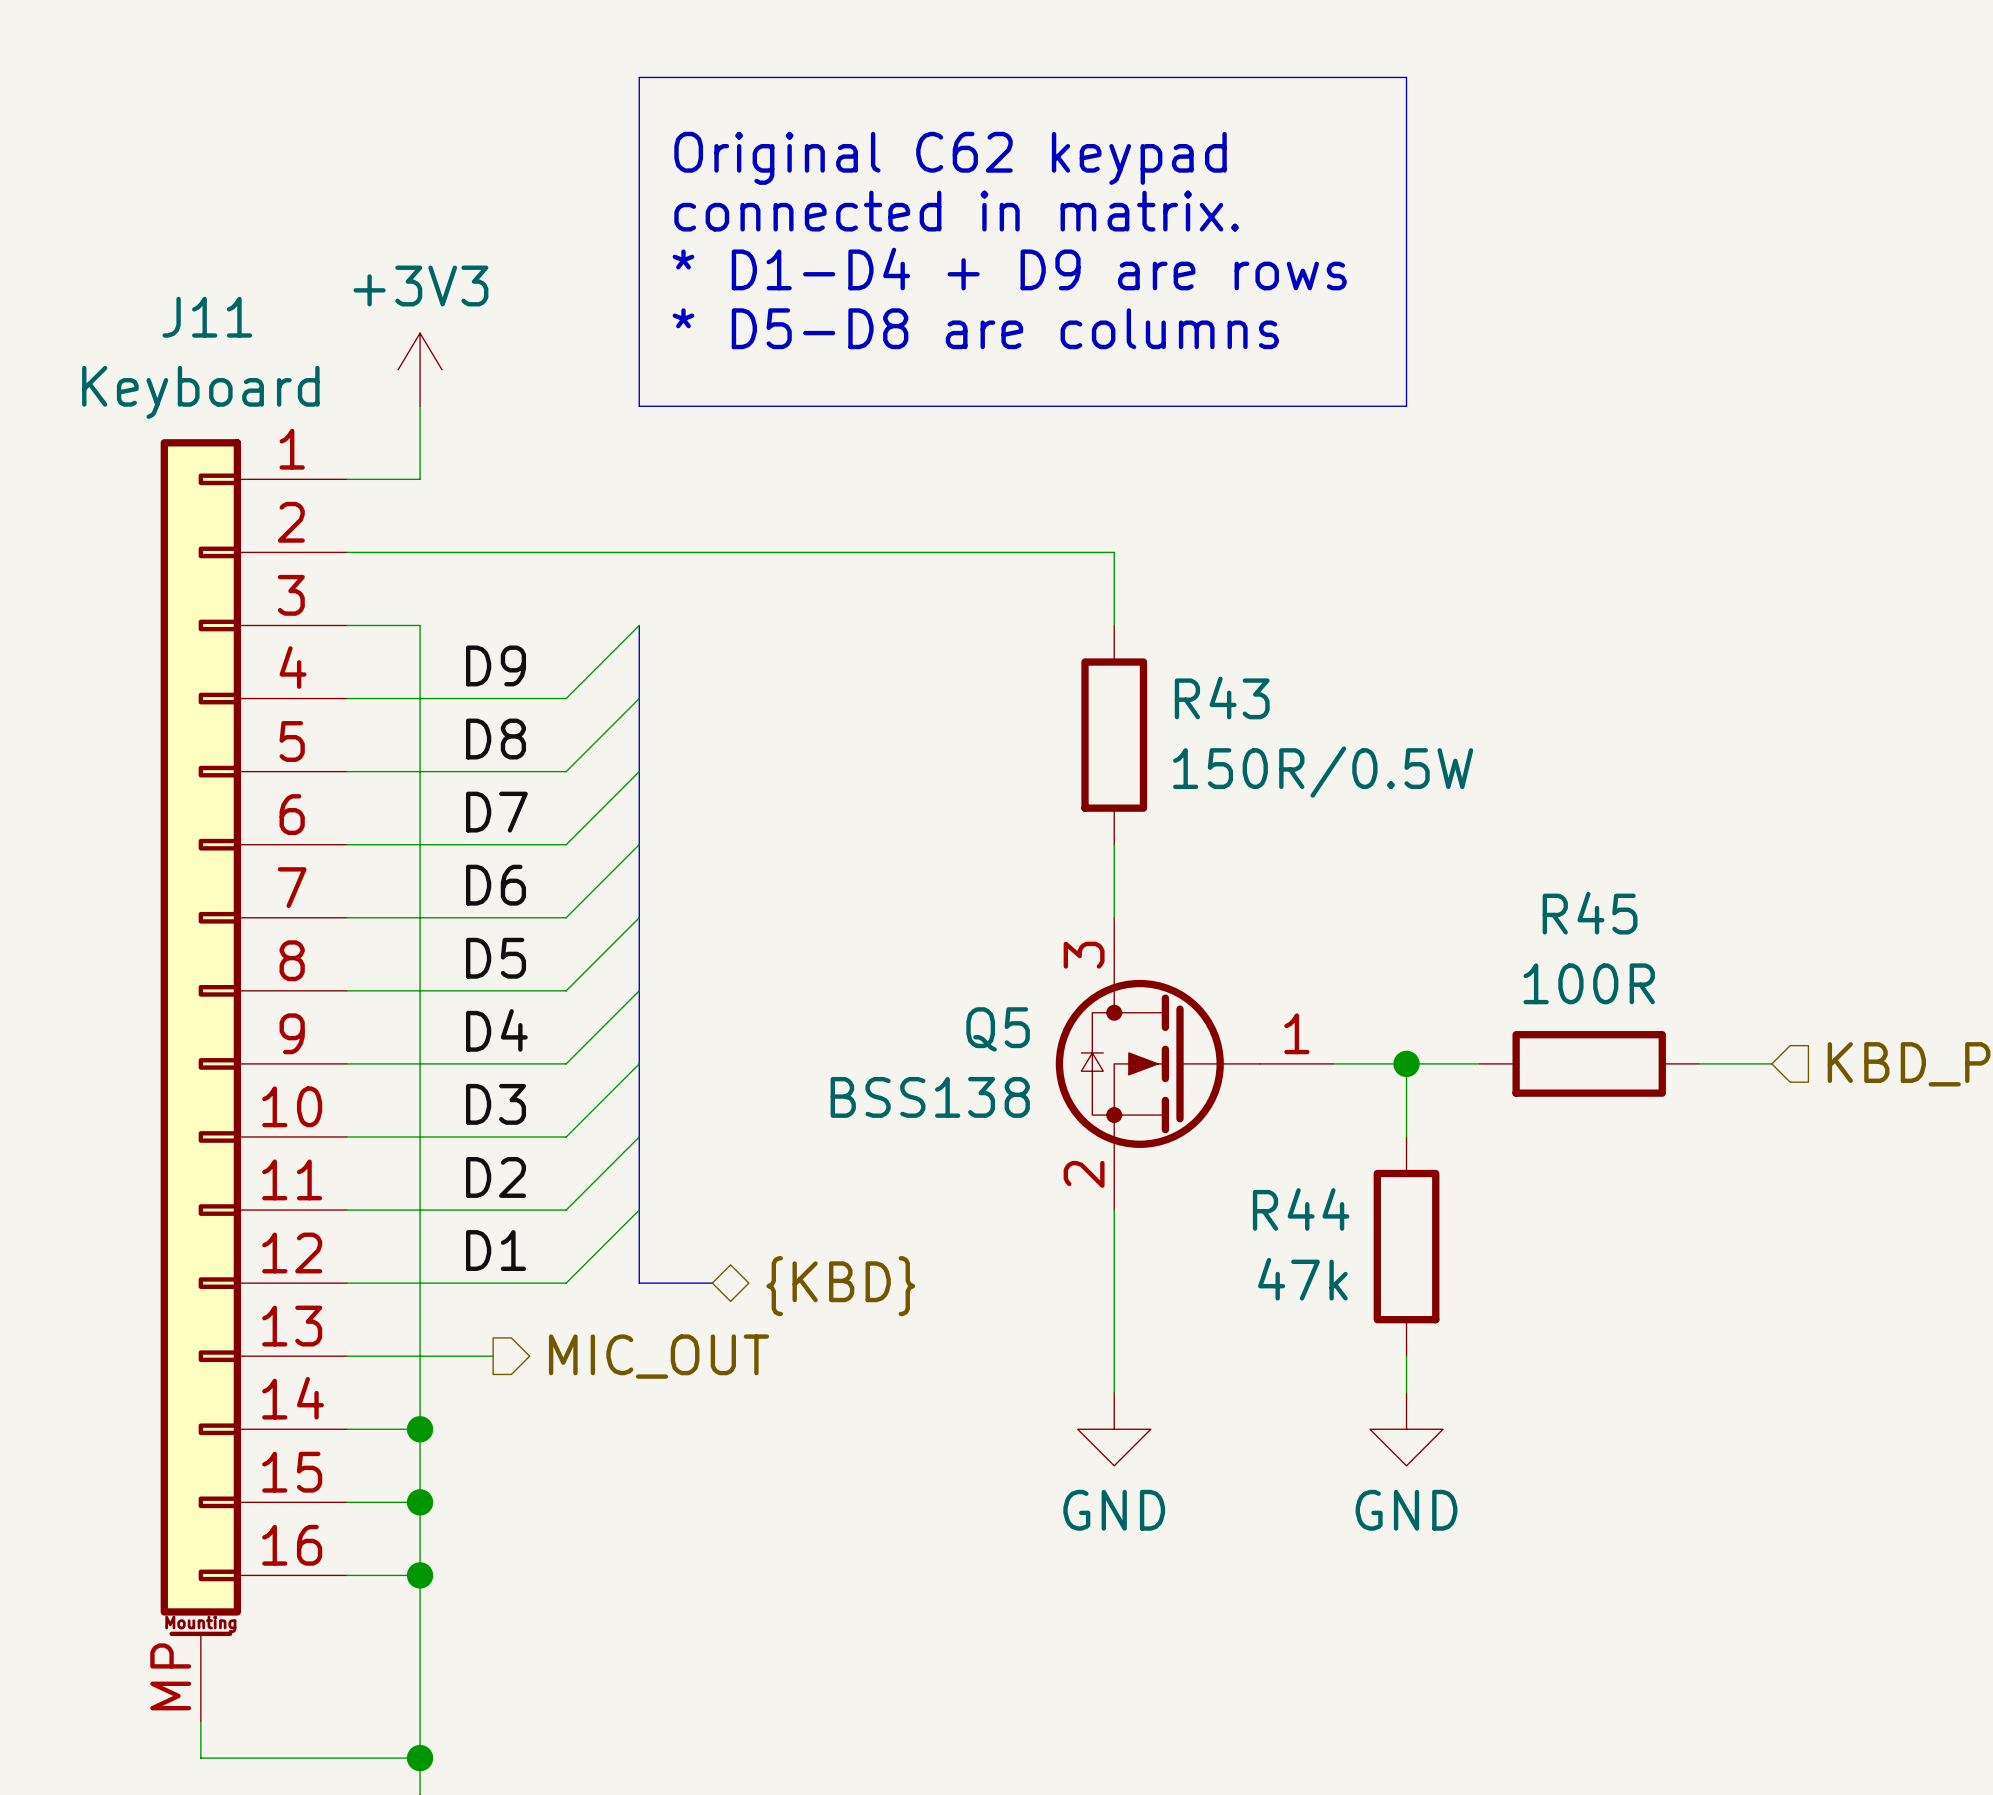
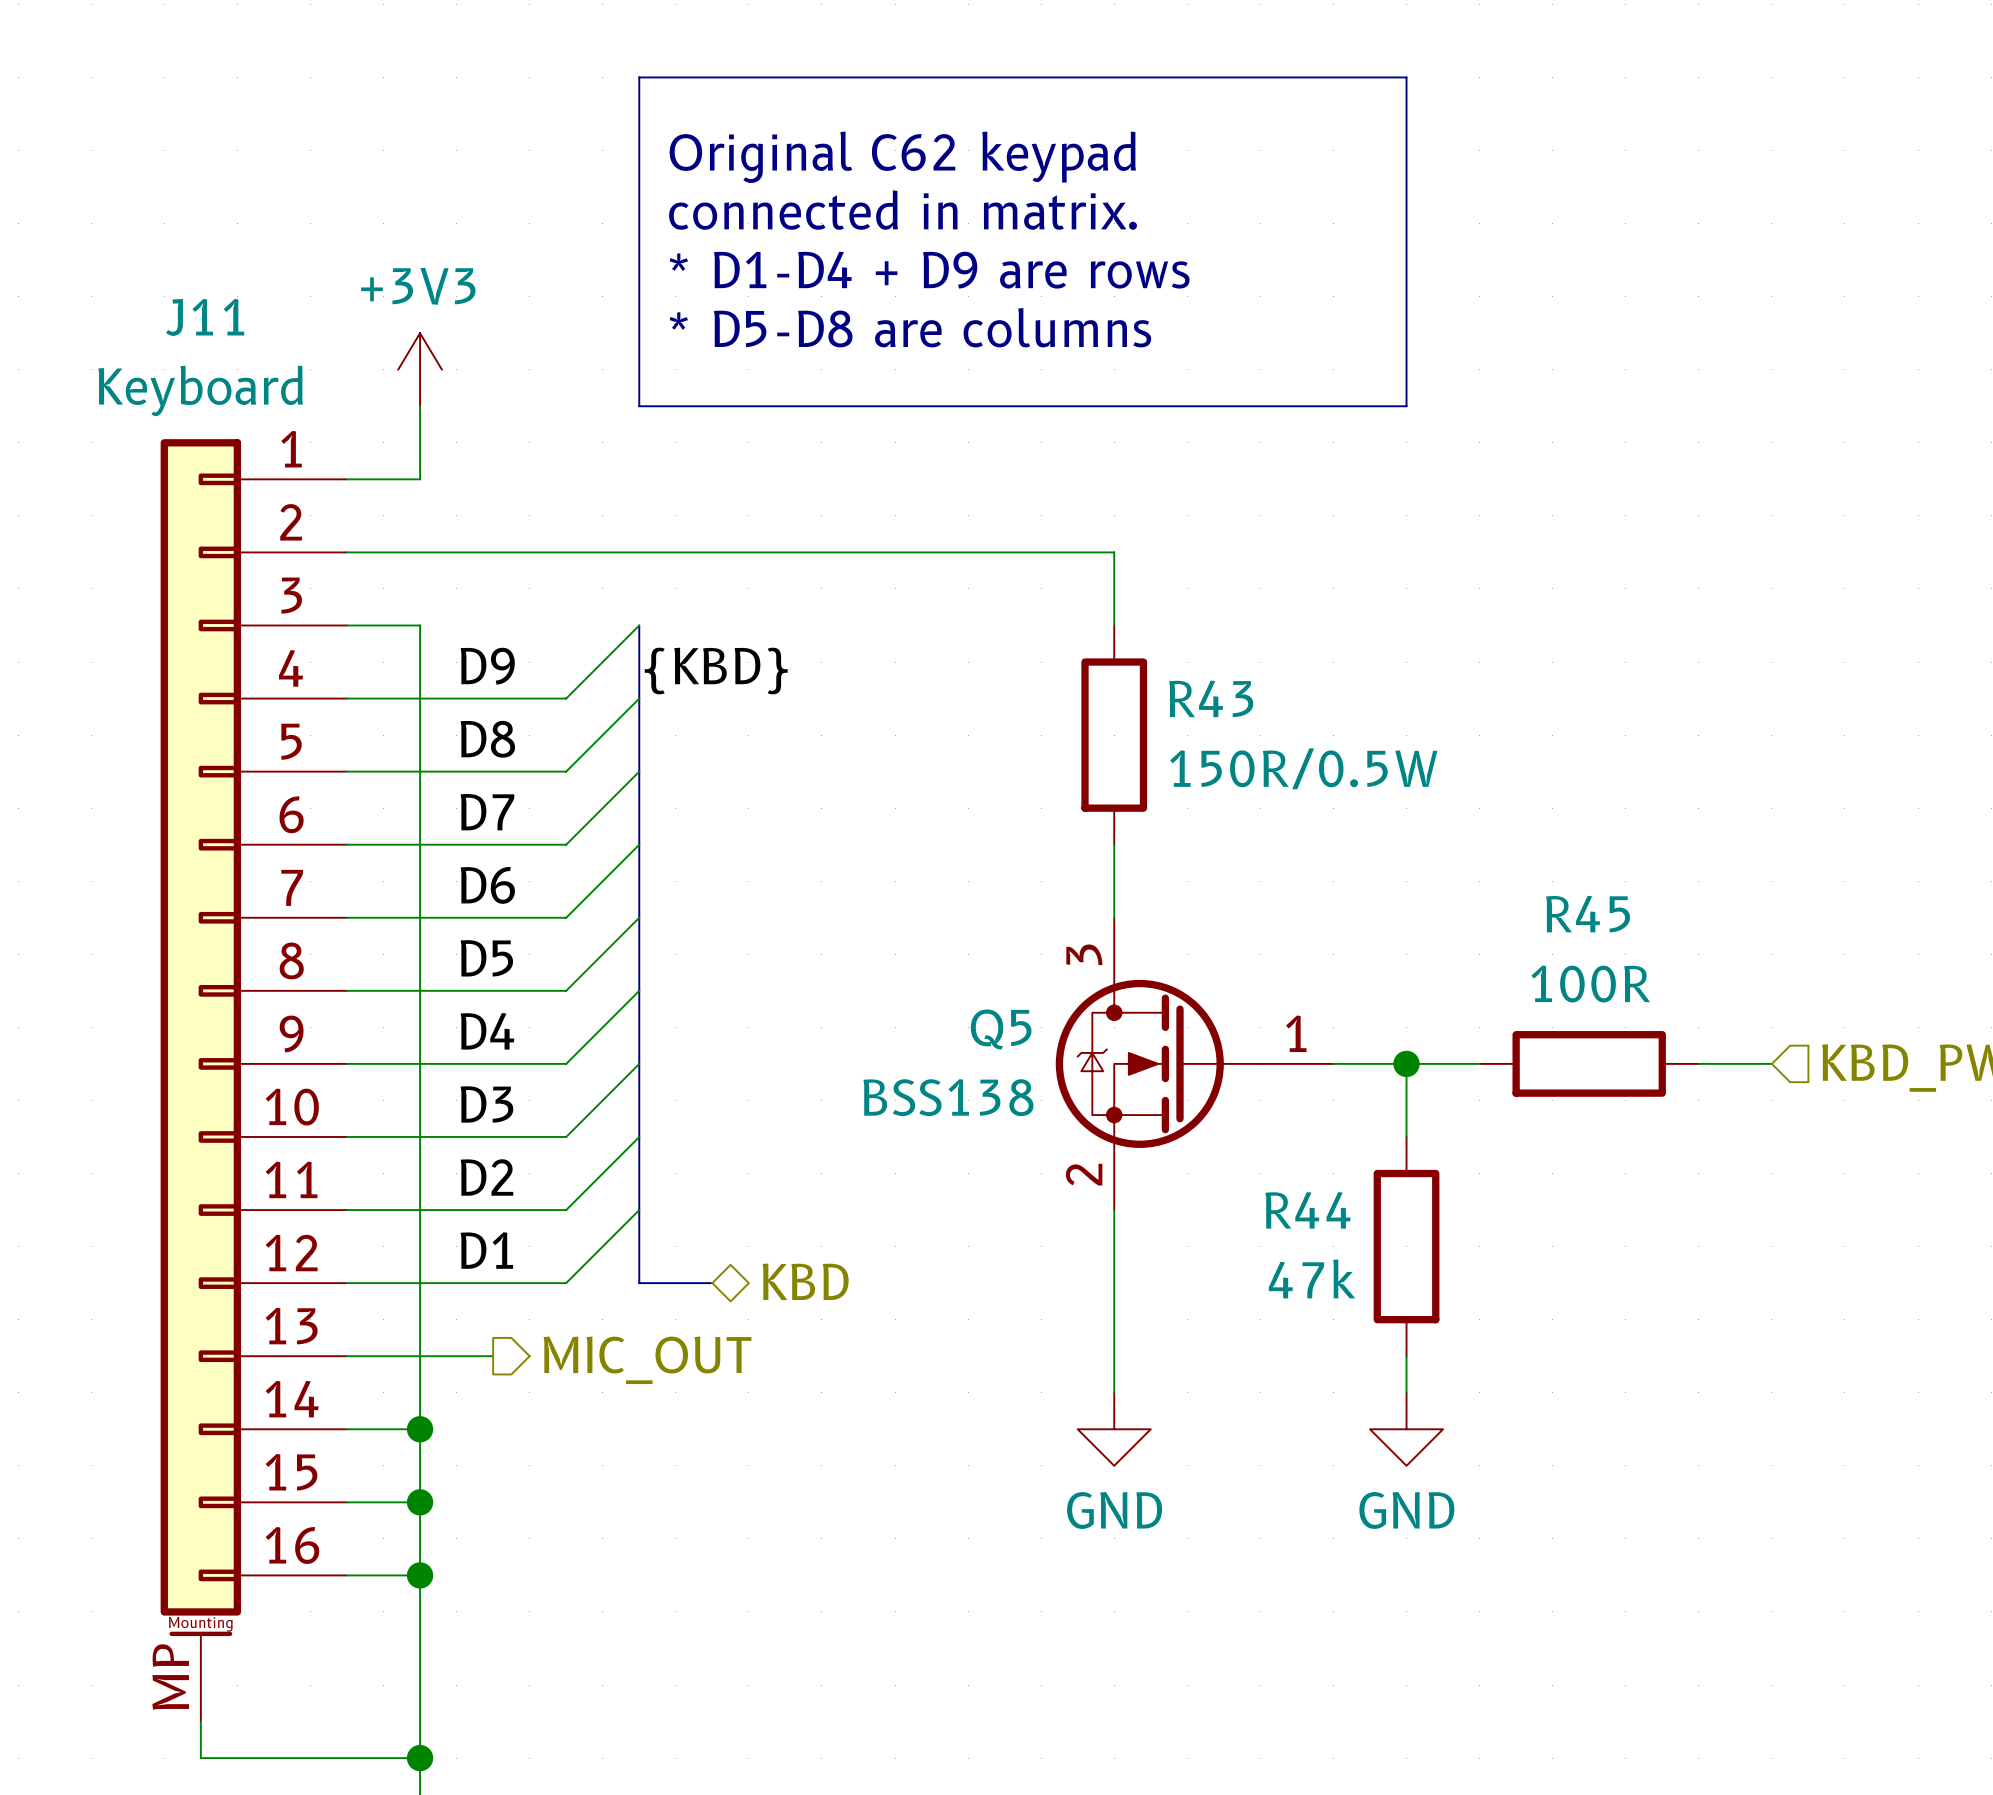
label: none -> {KBD} (716, 671)
Q5 symbol: [1055, 917, 1334, 1211] -> [1055, 917, 1334, 1211]
hierarchical label: {KBD} (840, 1286) -> KBD (805, 1281)

